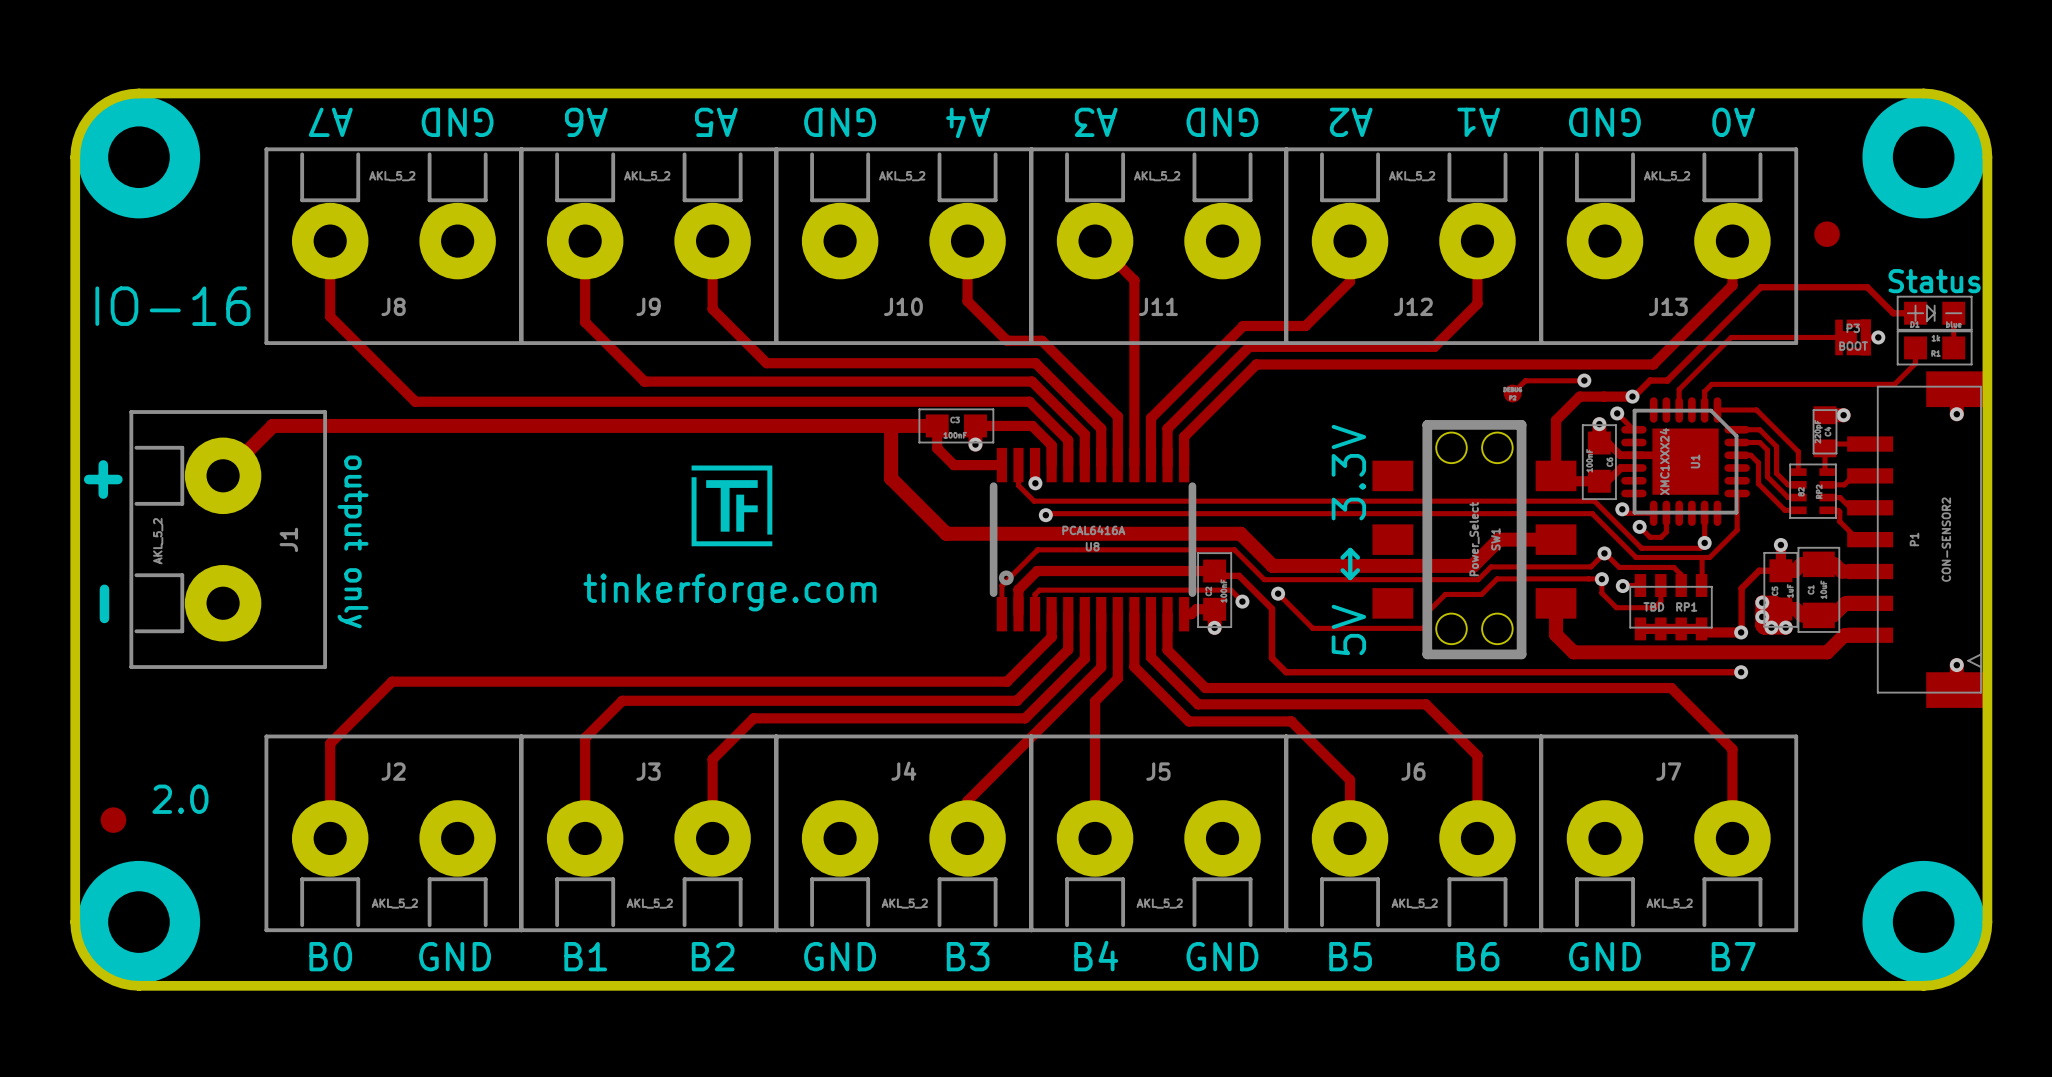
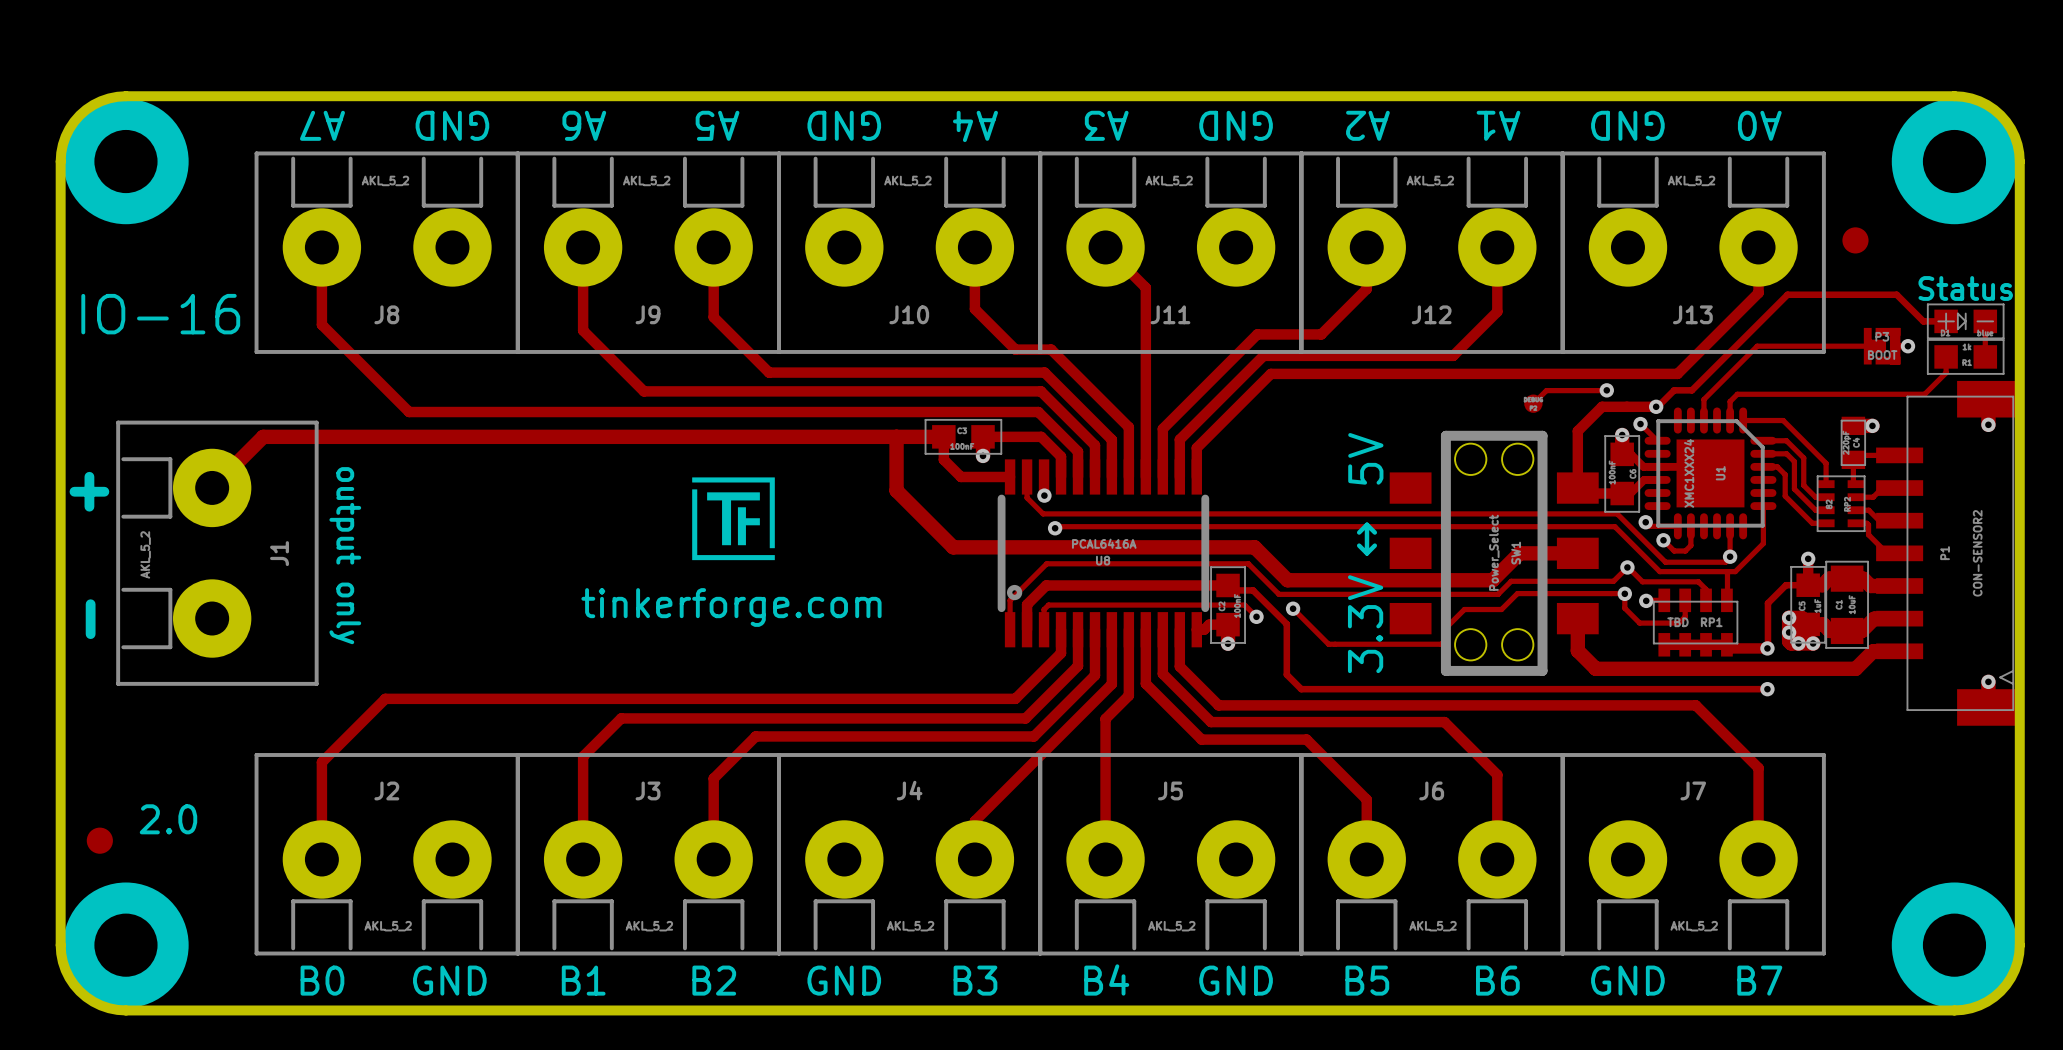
text position: 3.3V (1348, 472) -> 3.3V (1365, 624)
line: (1350, 554) (1350, 577) -> (1366, 529) (1366, 553)
line: (1342, 557) (1350, 549) (1357, 557) -> (1359, 532) (1366, 524) (1374, 532)
line: (1342, 570) (1350, 577) -> (1359, 545) (1366, 553)
line: (1357, 570) (1350, 577) -> (1374, 545) (1366, 553)
text position: 5V (1348, 629) -> 5V (1365, 458)

